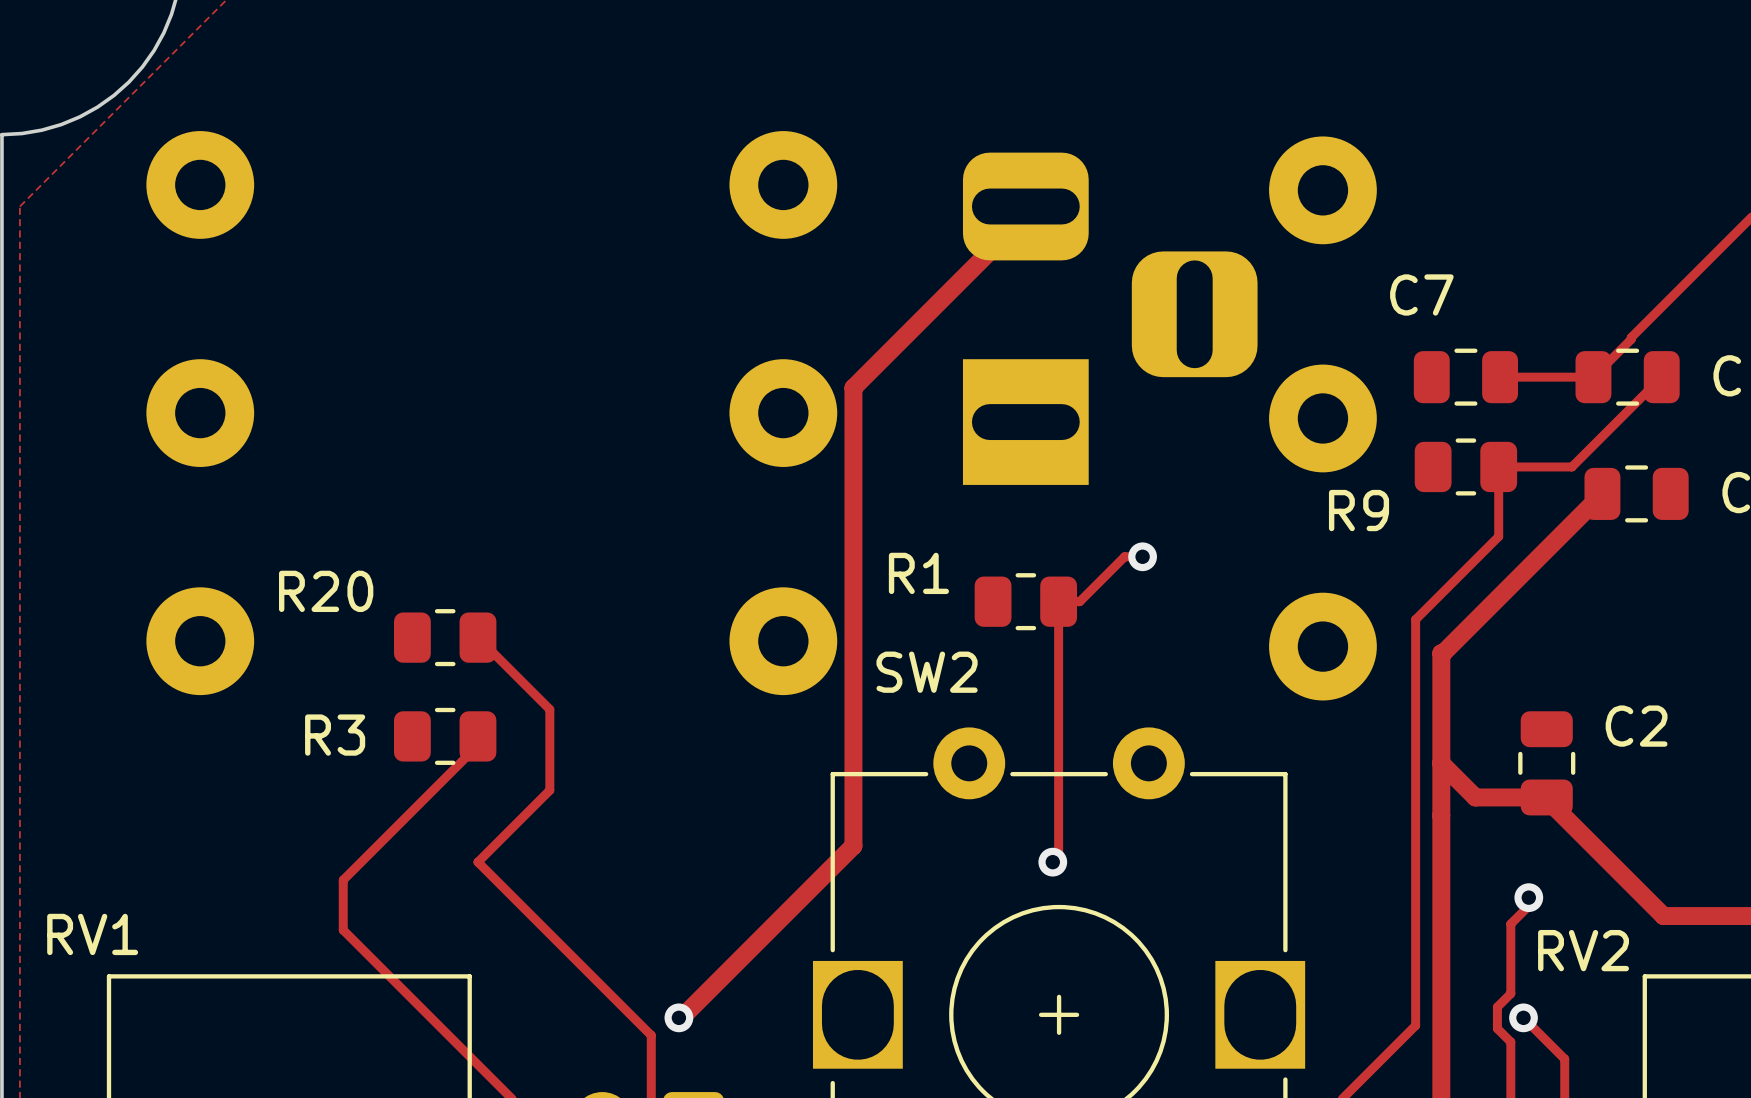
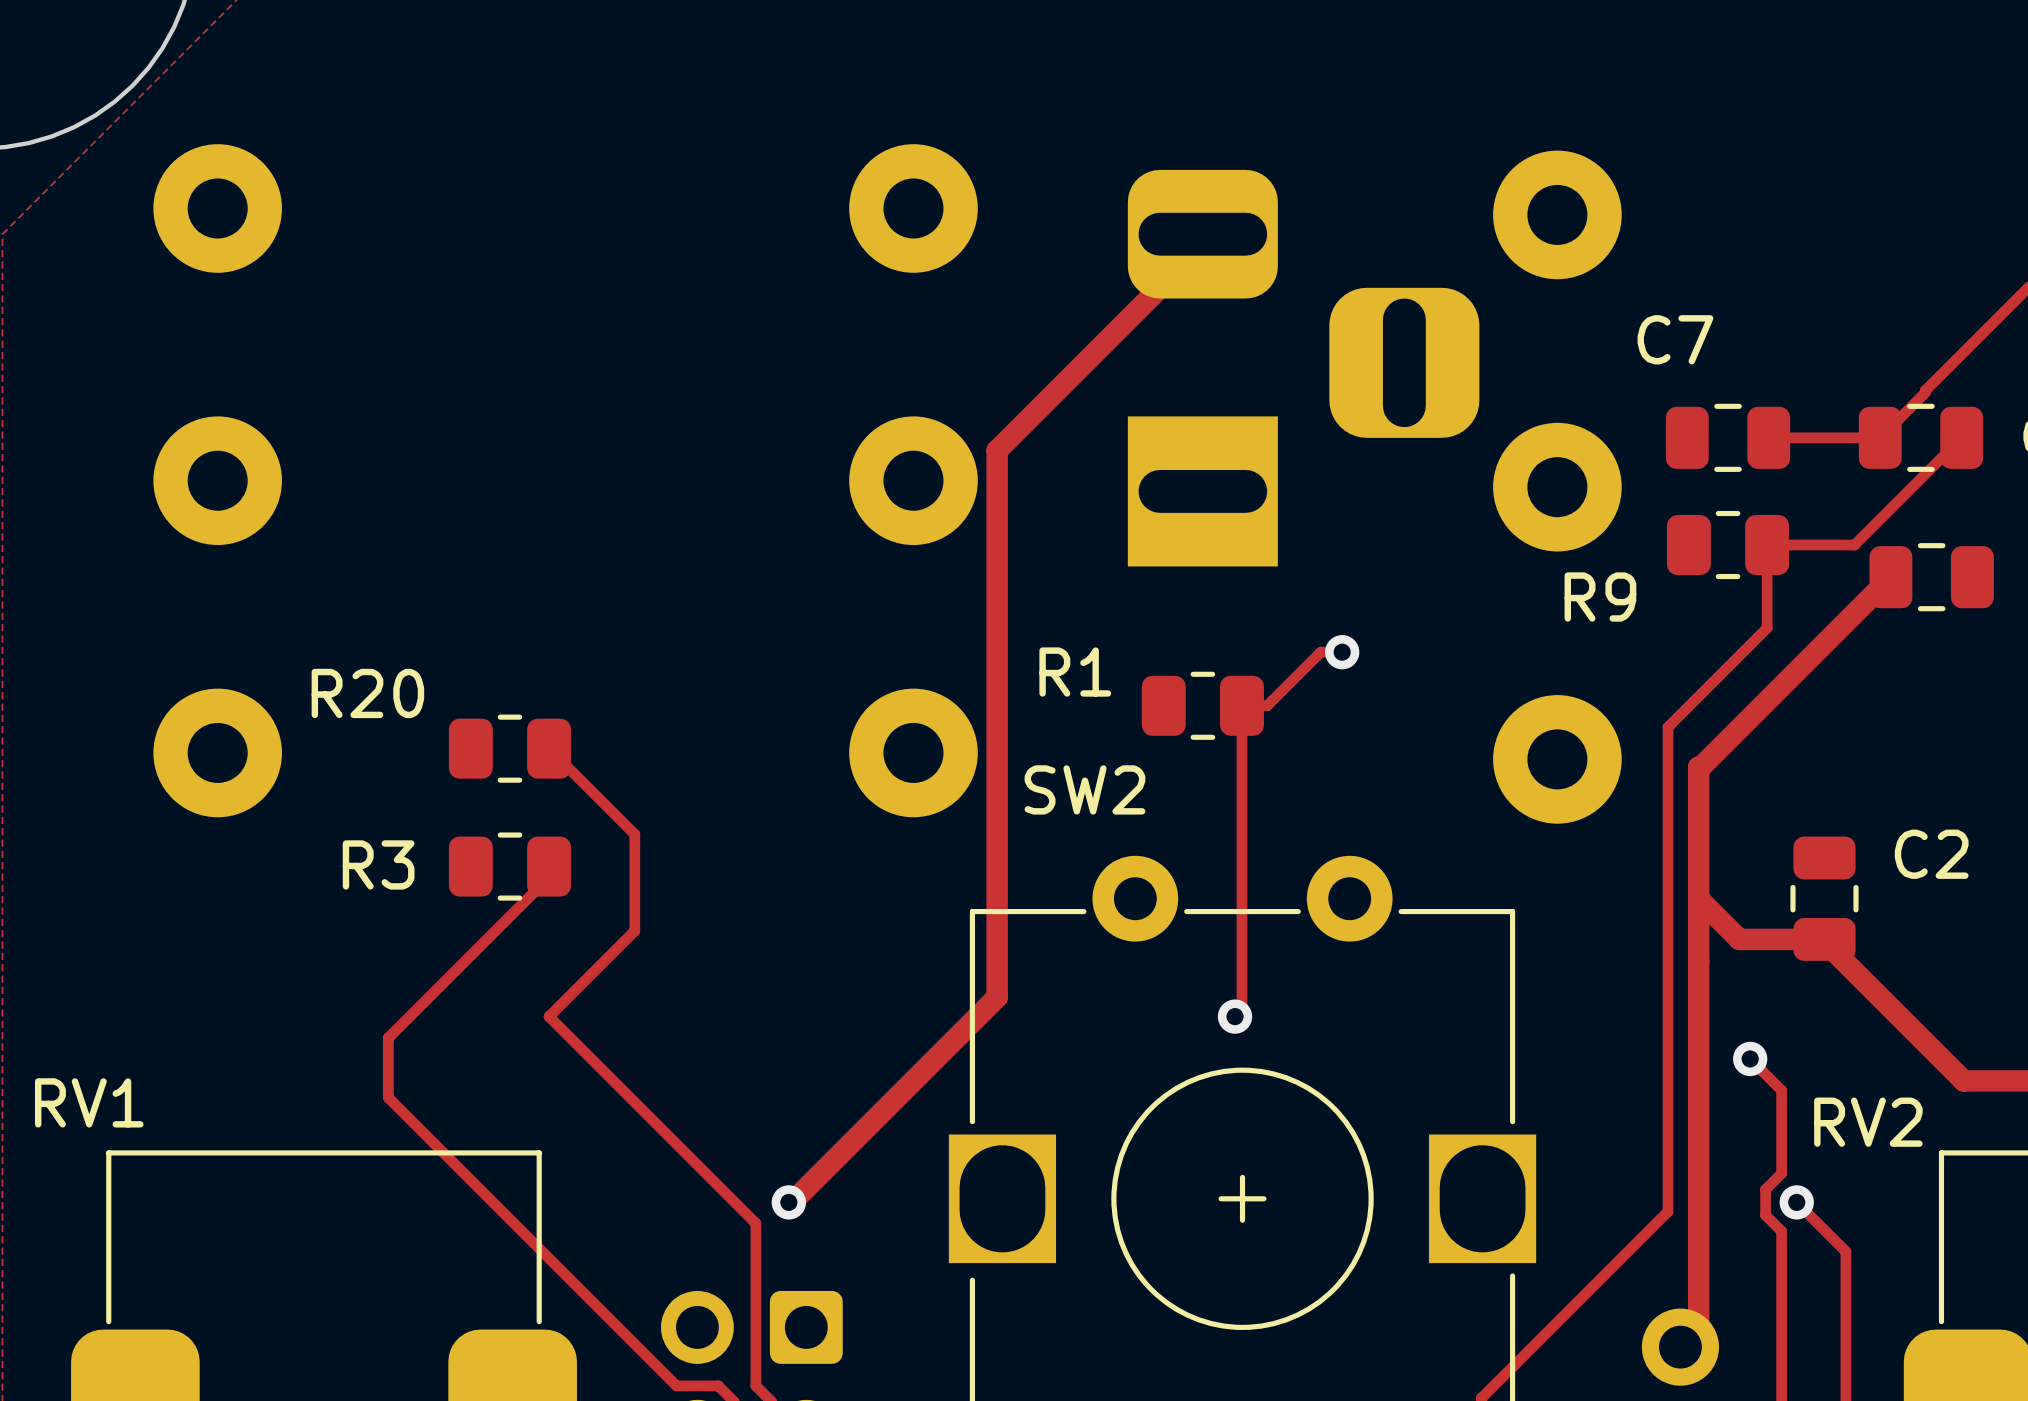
track: (1528, 897) (1528, 906) (1510, 923) -> (1750, 1058) (1781, 1090)
via position: (1528, 897) -> (1750, 1058)

